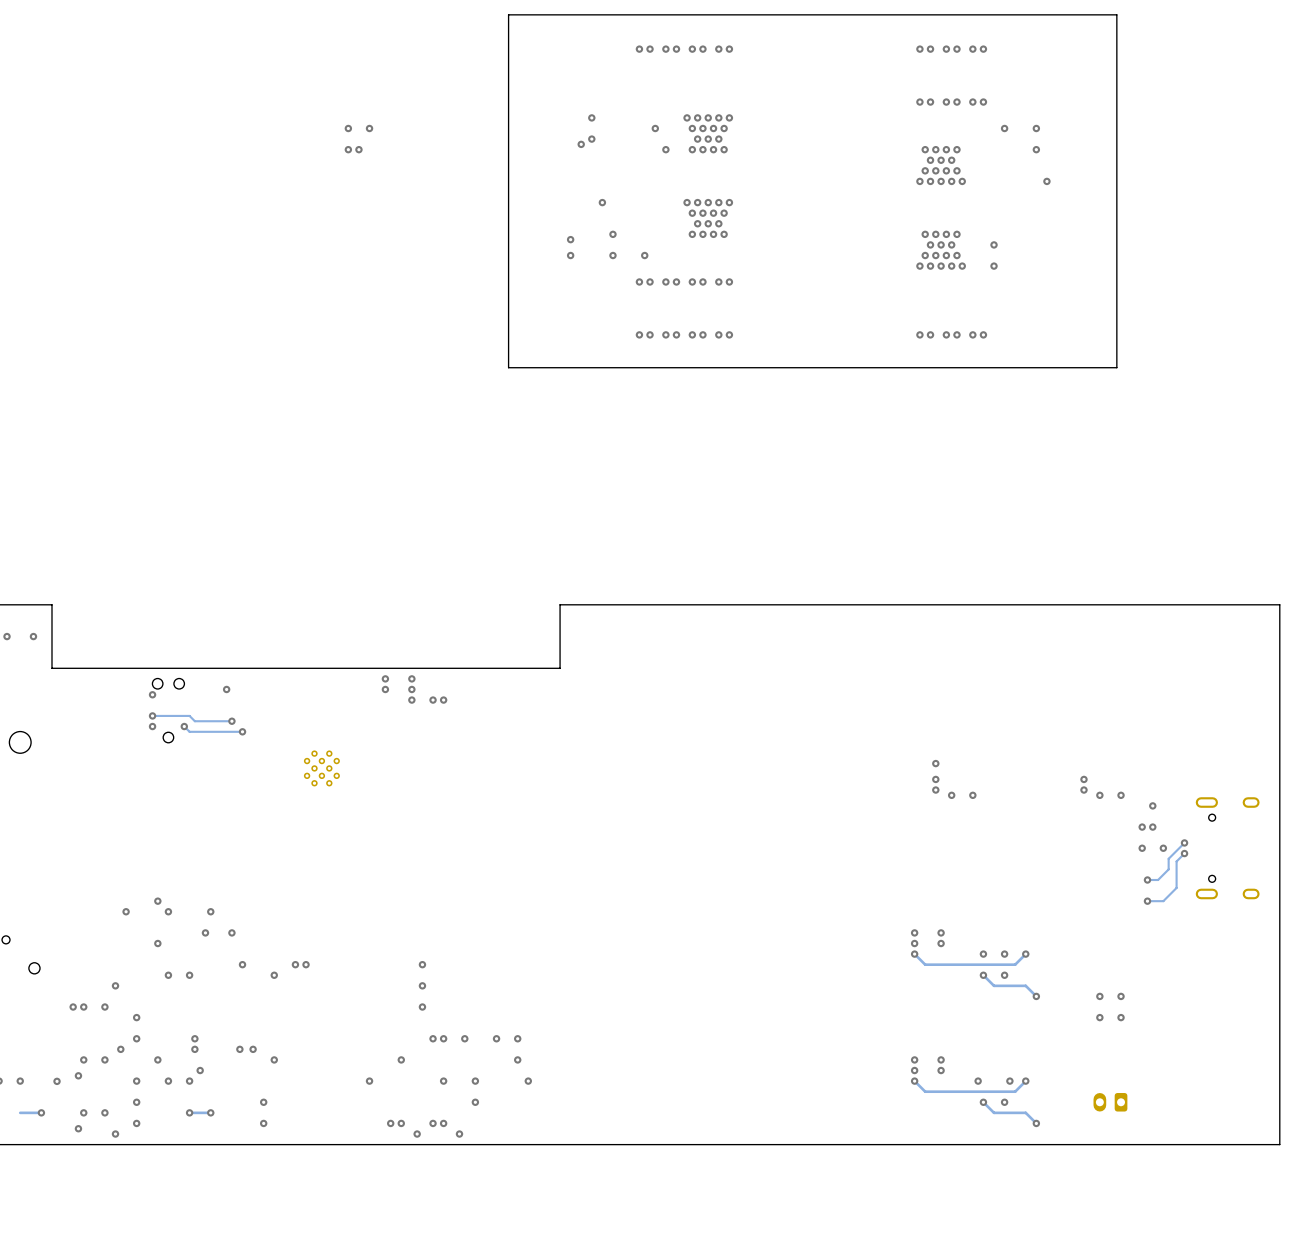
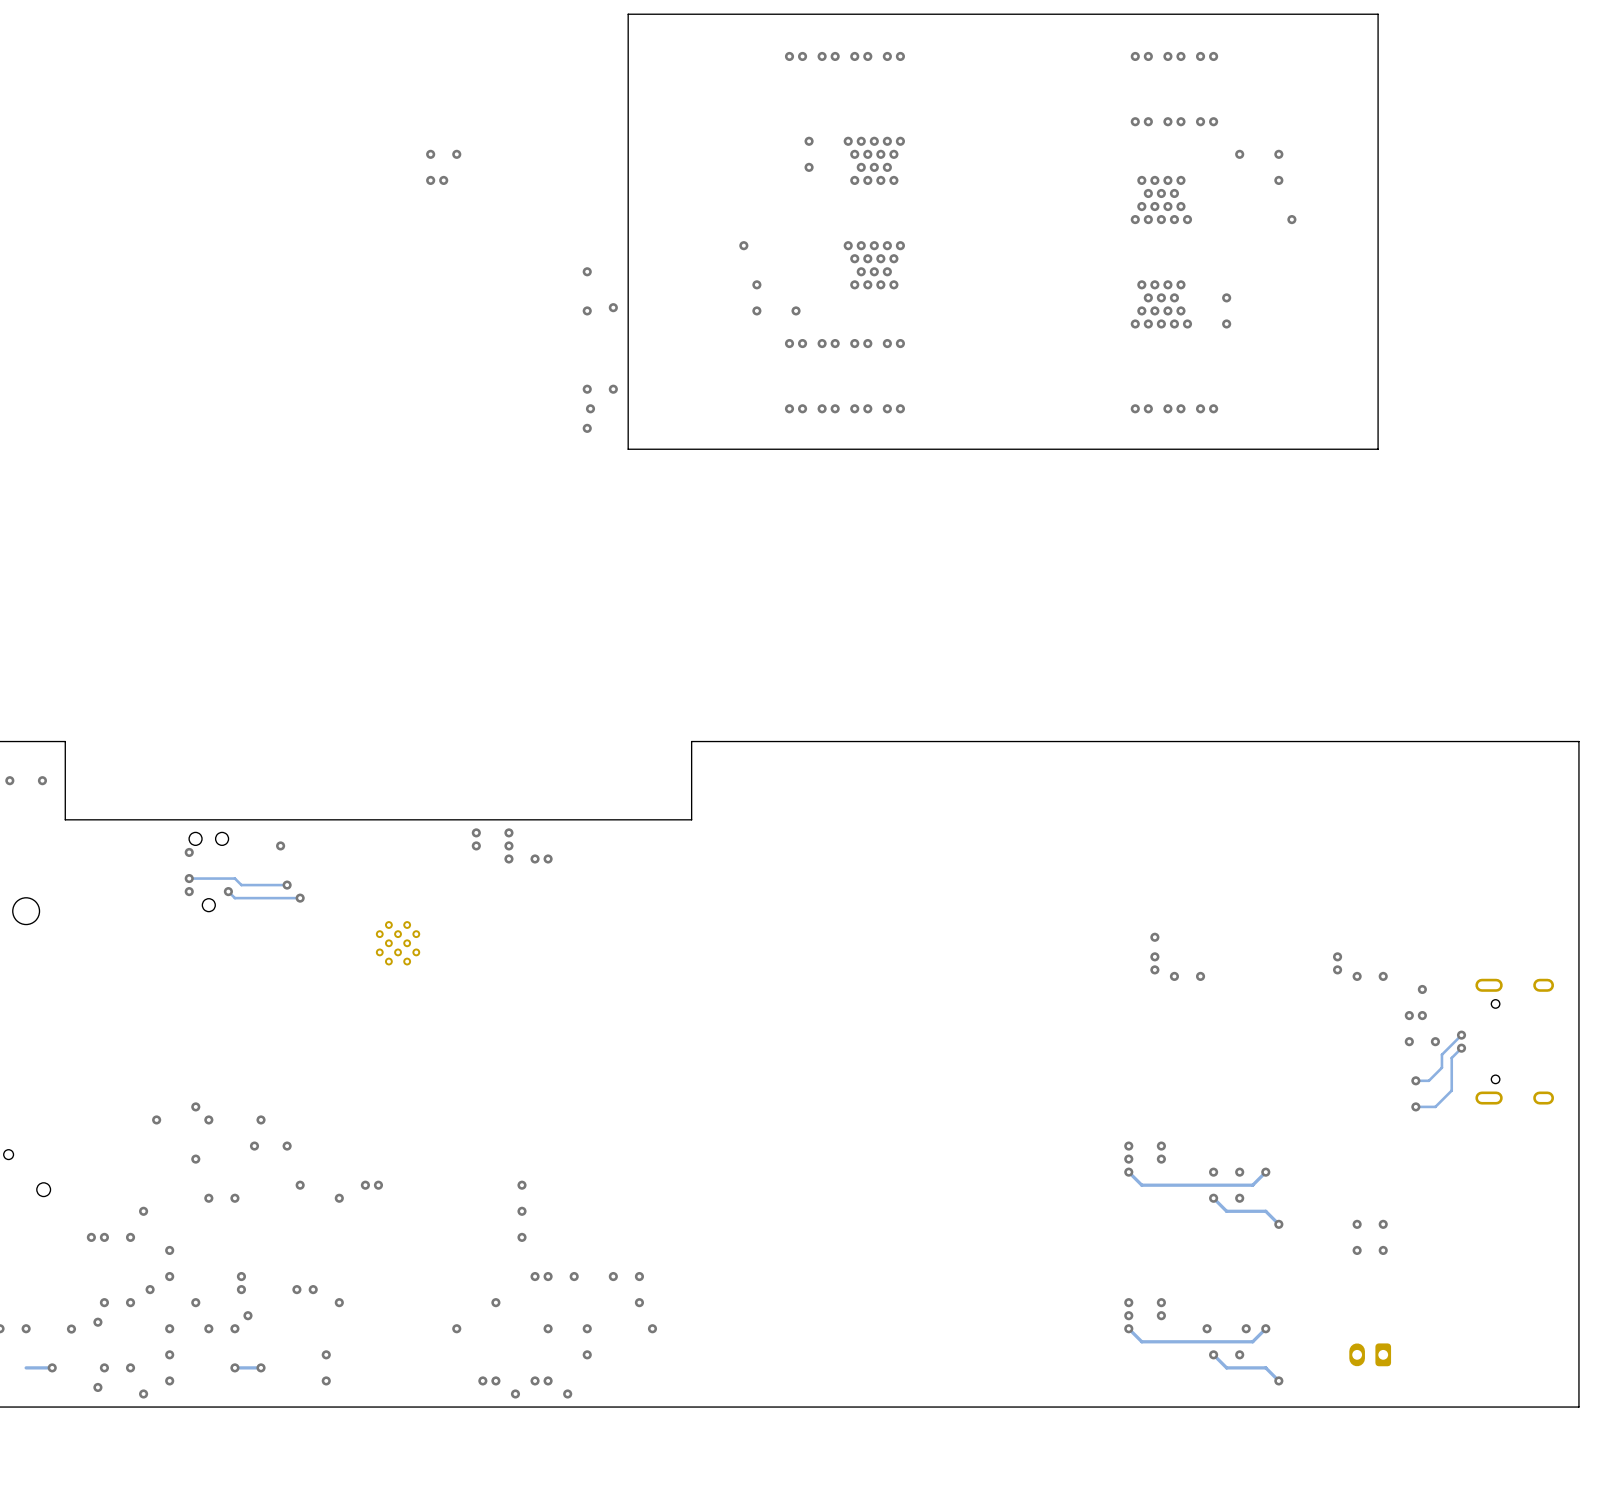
via: (591, 117) -> none
via: none -> (809, 141)
via: (655, 128) -> none
via: (591, 139) -> none
via: none -> (809, 167)
via: (581, 144) -> none
via: (665, 149) -> none
via: none -> (587, 271)
via: (570, 239) -> none
via: none -> (613, 307)
via: none -> (587, 310)
via: (570, 255) -> none
via: none -> (587, 389)
via: none -> (613, 389)
via: none -> (590, 408)
via: none -> (587, 428)

